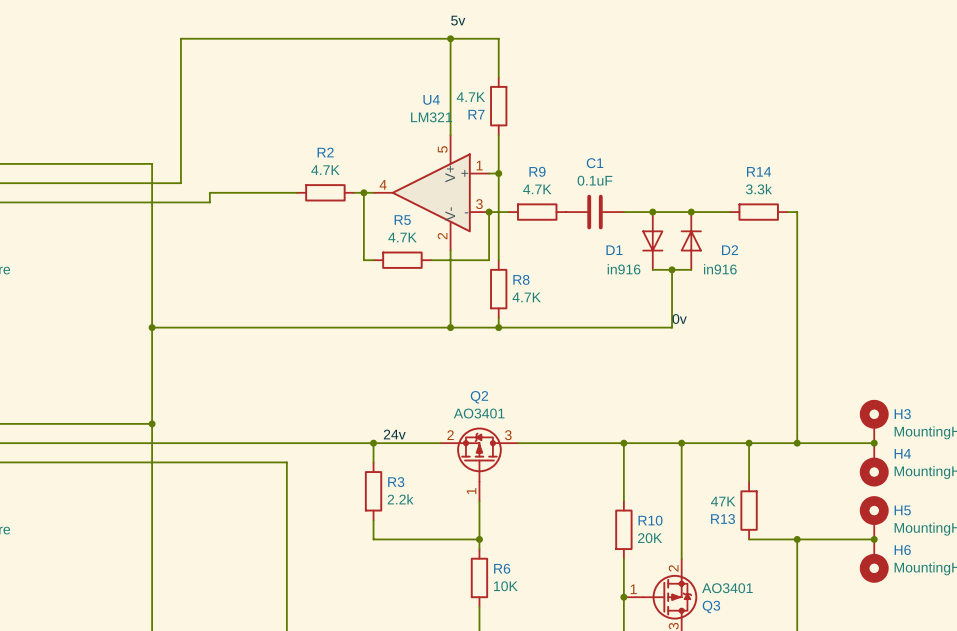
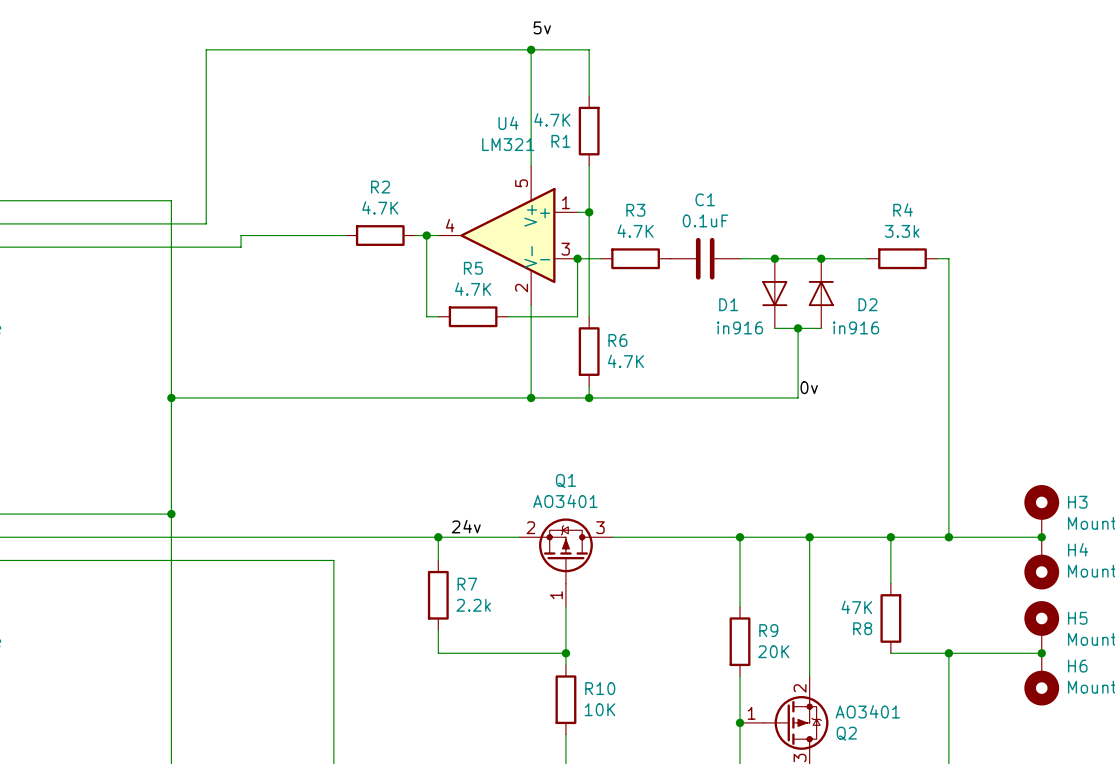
R7 name: R7 (476, 114) -> R1 (560, 141)
R9 name: R9 (537, 171) -> R3 (635, 210)
R14 name: R14 (759, 171) -> R4 (903, 209)
R8 name: R8 (521, 279) -> R6 (617, 340)
Q2 name: Q2 (479, 397) -> Q1 (565, 480)
R3 name: R3 (396, 482) -> R7 (467, 584)
R13 name: R13 (723, 519) -> R8 (862, 628)
R10 name: R10 (650, 520) -> R9 (768, 630)
R6 name: R6 (502, 568) -> R10 (600, 688)
Q3 name: Q3 (711, 606) -> Q2 (846, 733)

